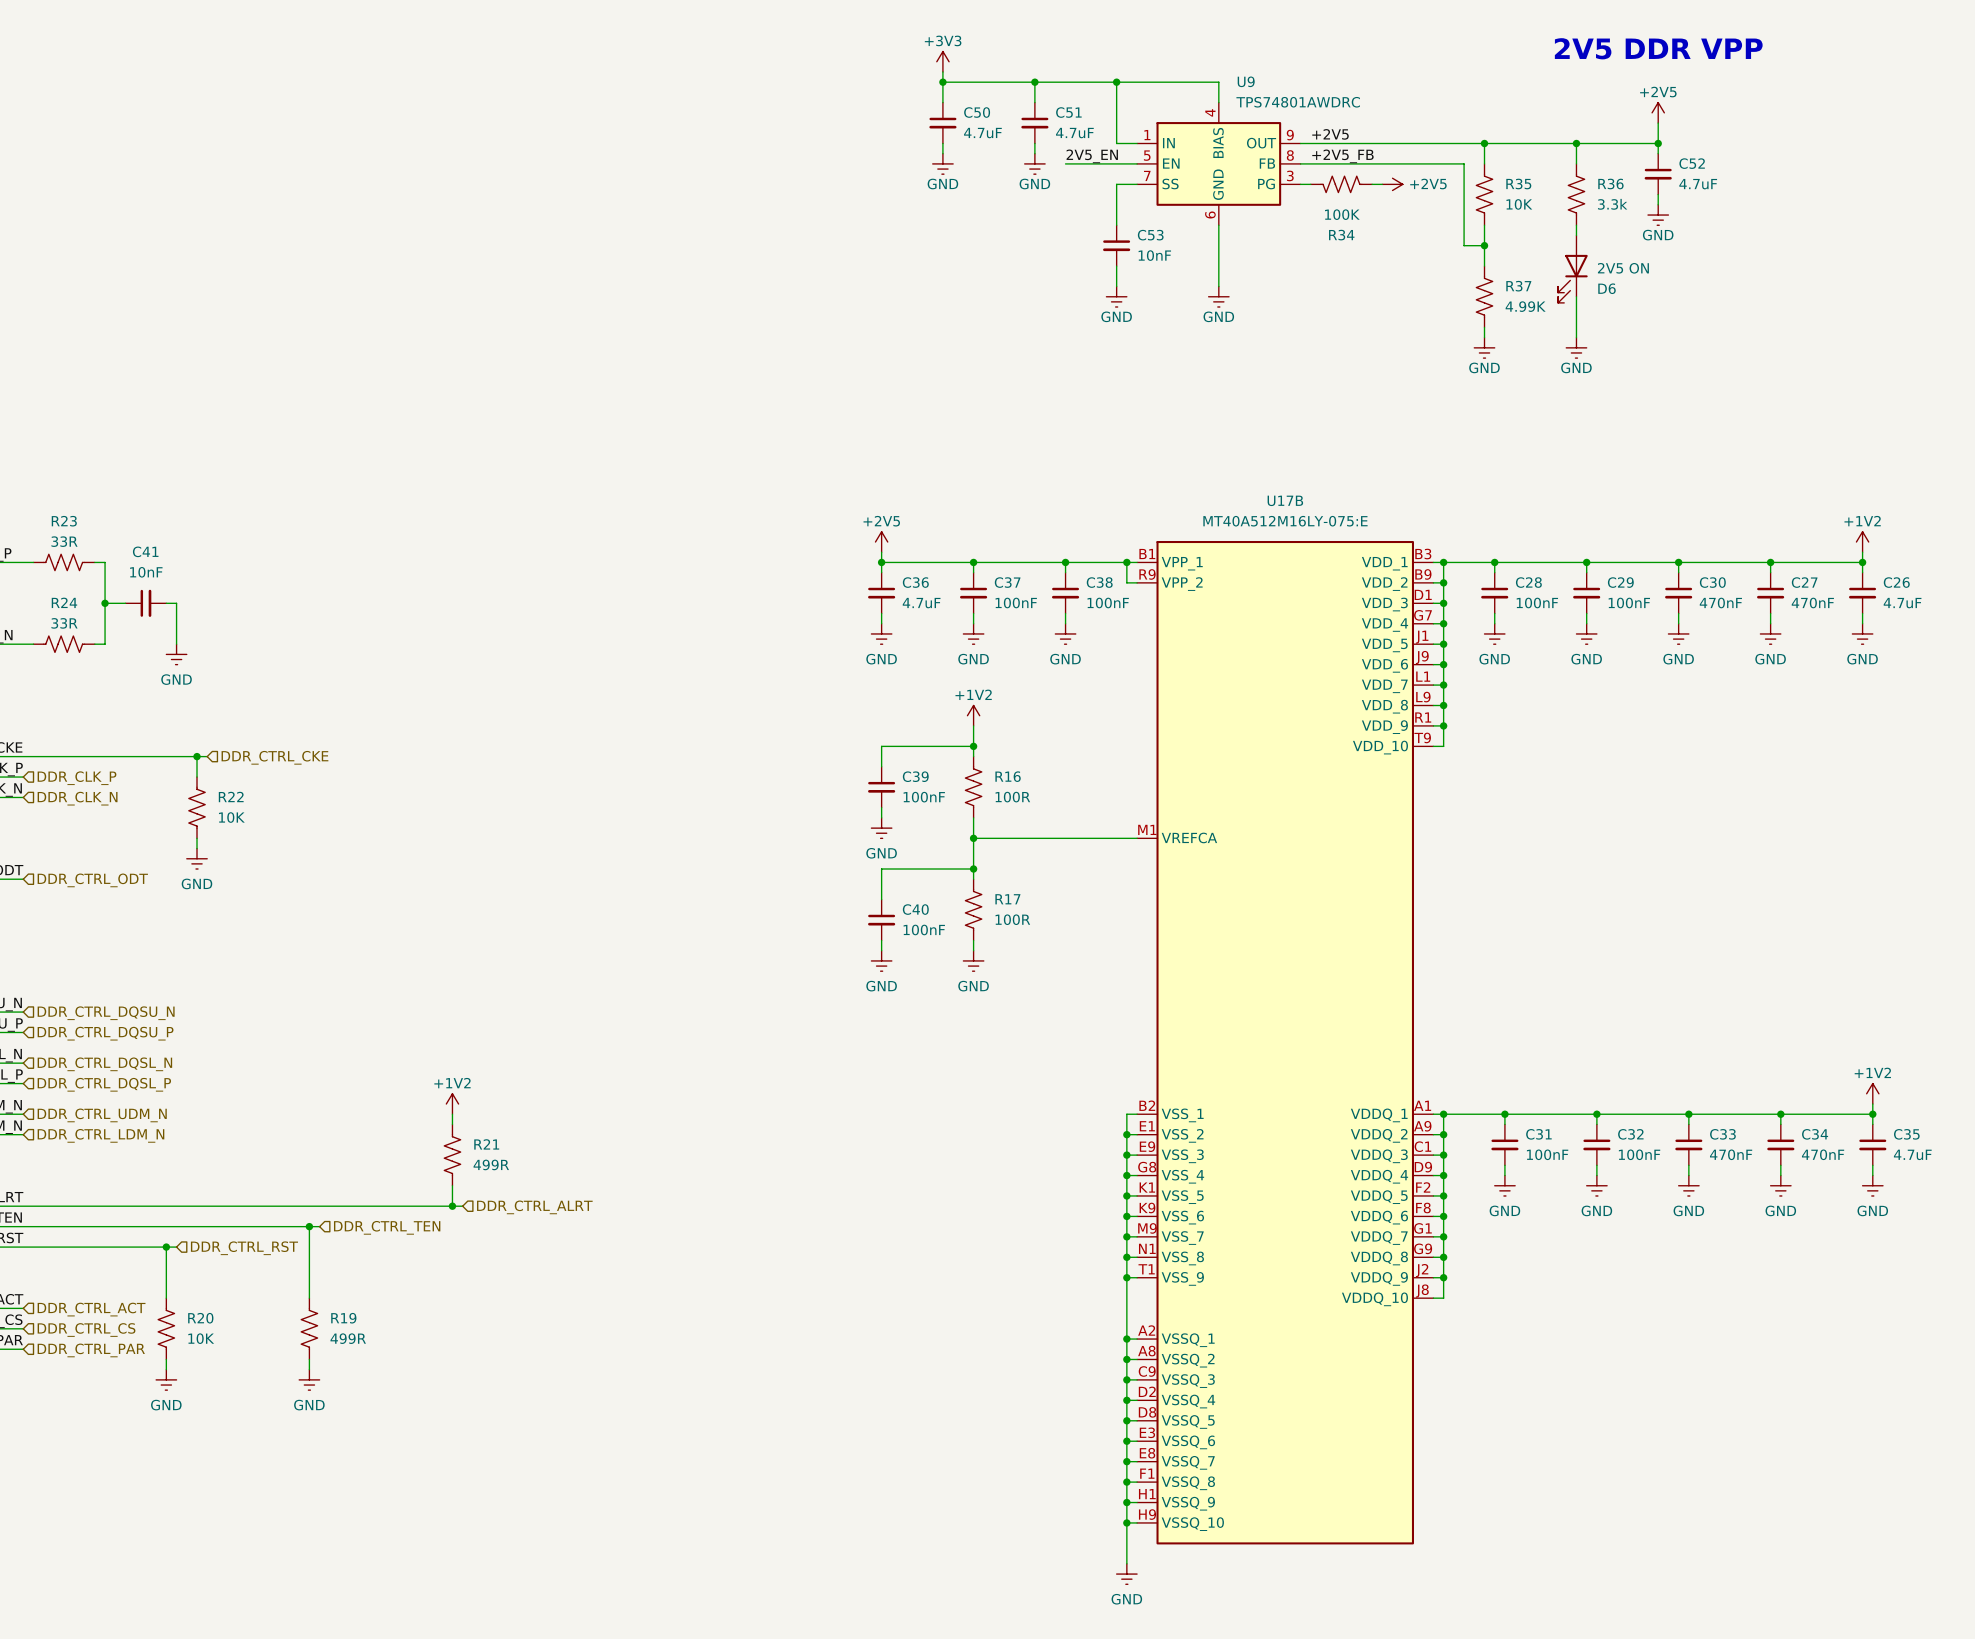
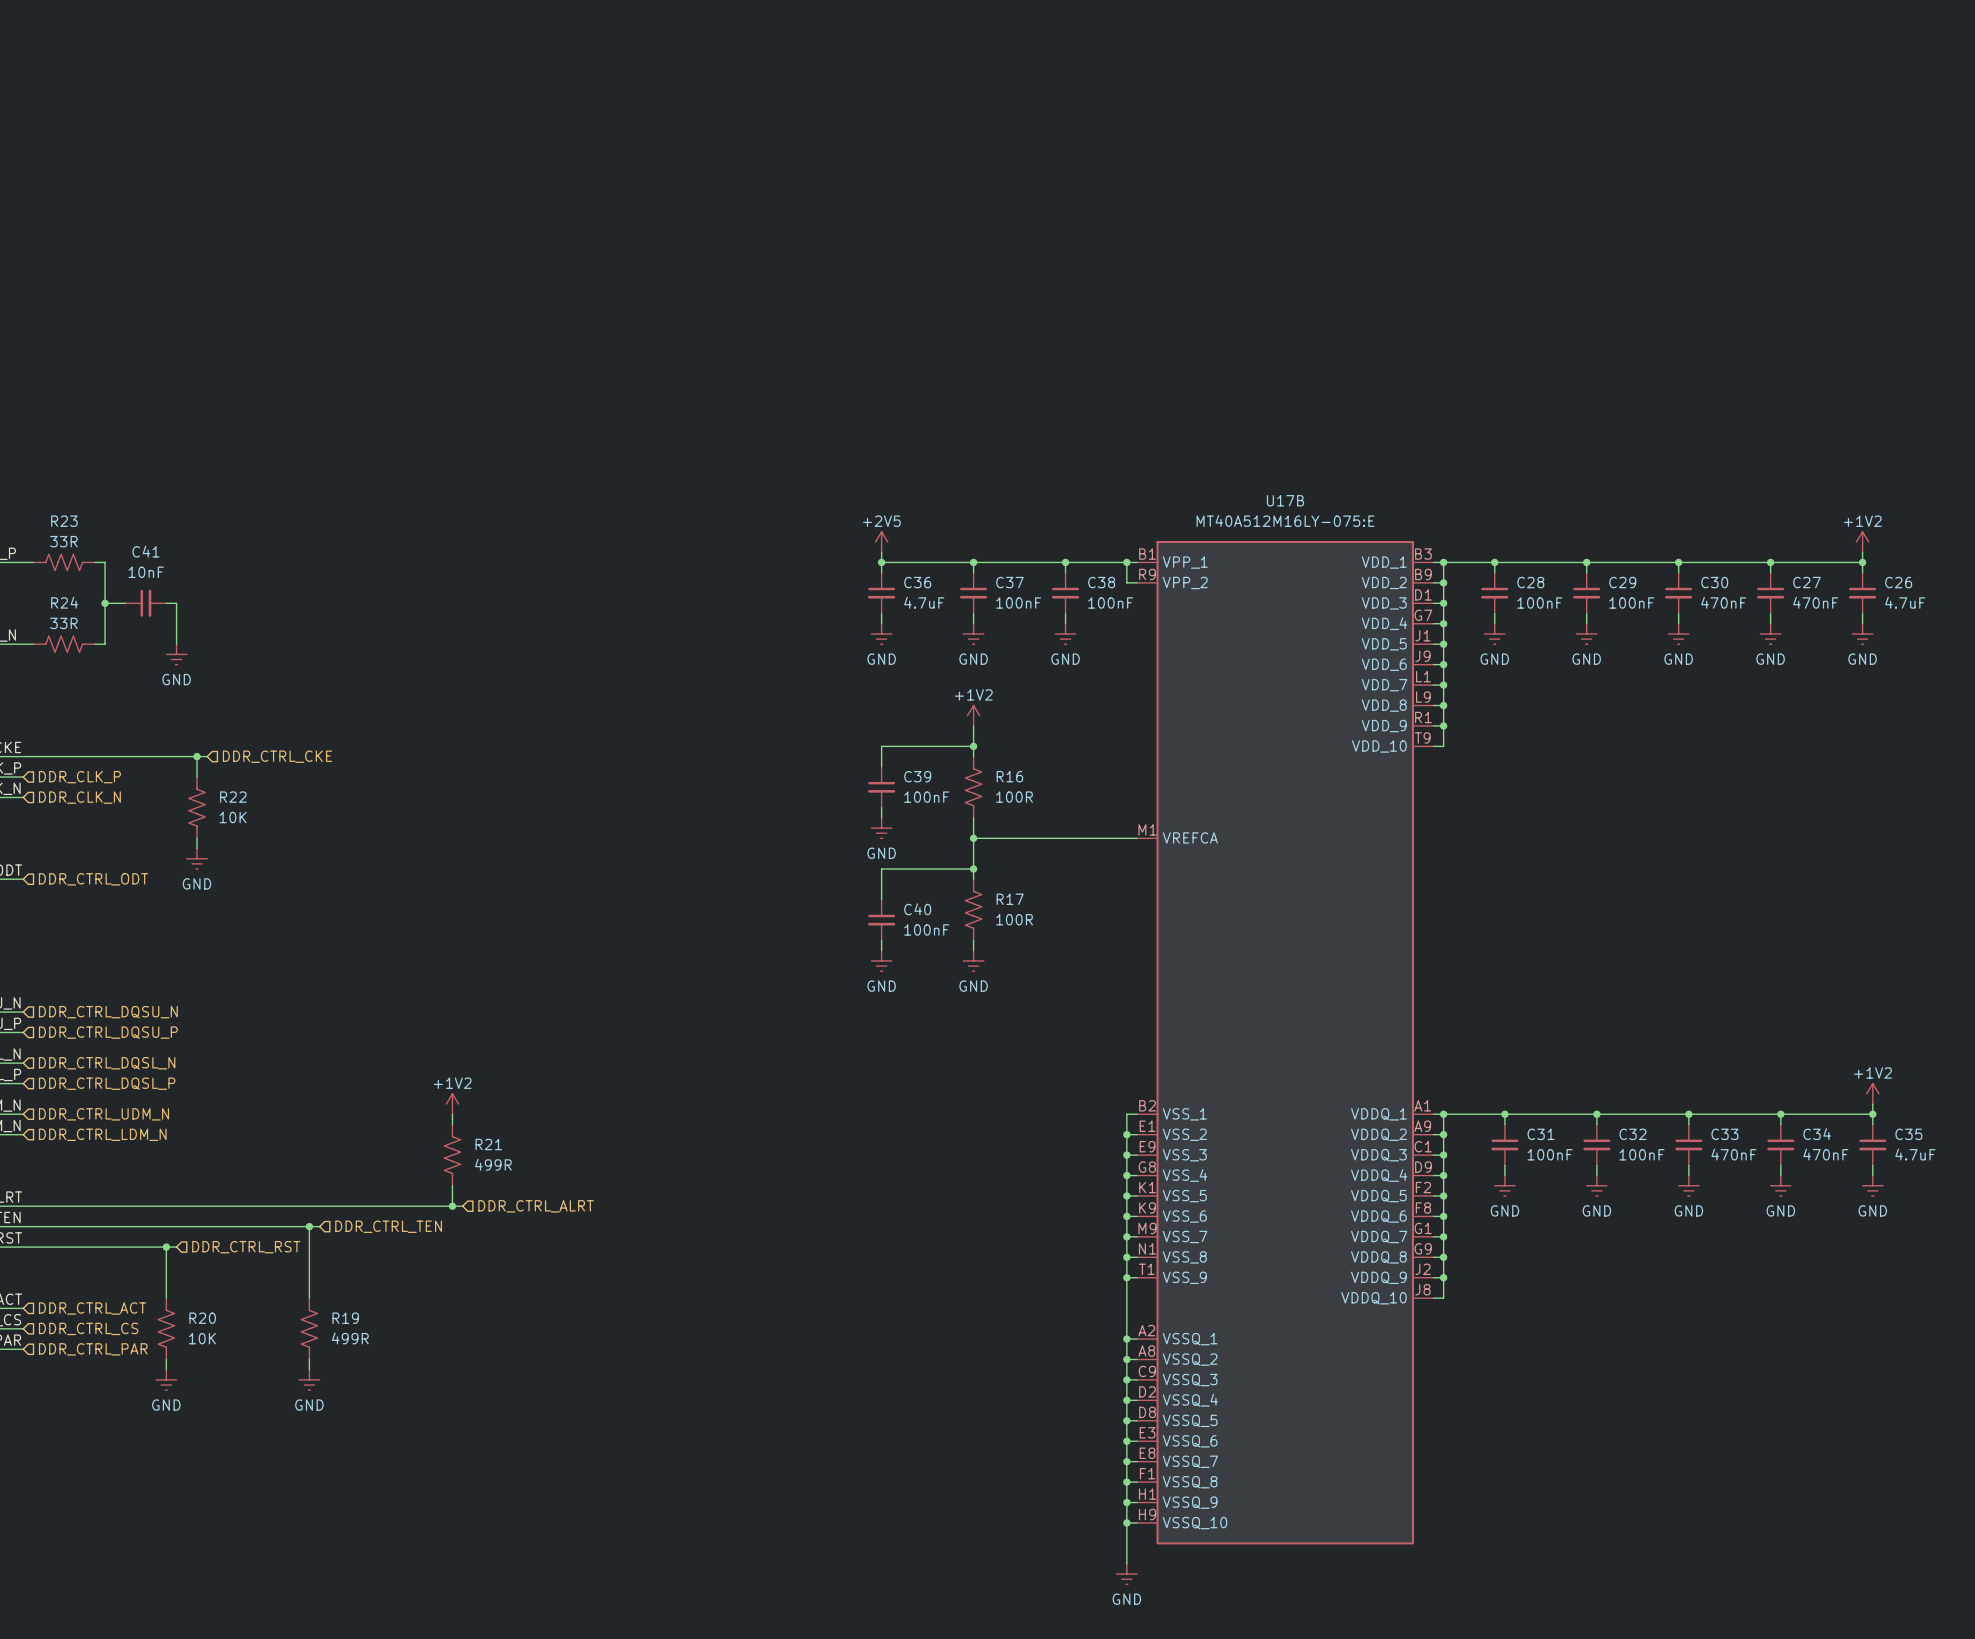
text: 2V5 DDR VPP (1658, 48) -> none
power symbol: +3V3 (942, 61) -> none
wire: (942, 71) (942, 102) -> none
wire: (942, 82) (1218, 82) (1218, 102) -> none
junction: (942, 82) -> none
wire: (1034, 82) (1034, 102) -> none
junction: (1034, 82) -> none
wire: (1116, 82) (1116, 143) (1137, 143) -> none
junction: (1116, 82) -> none
power symbol: +2V5 (1658, 112) -> none
C50: 4.7uF (942, 123) -> none
C51: 4.7uF (1034, 123) -> none
wire: (1658, 123) (1658, 153) -> none
label: +2V5 (1330, 134) -> none
wire: (942, 143) (942, 153) -> none
wire: (1034, 143) (1034, 153) -> none
wire: (1300, 143) (1658, 143) -> none
wire: (1484, 143) (1484, 163) -> none
junction: (1484, 143) -> none
wire: (1576, 143) (1576, 163) -> none
junction: (1576, 143) -> none
junction: (1658, 143) -> none
label: 2V5_EN (1092, 156) -> none
label: +2V5_FB (1342, 156) -> none
power symbol: GND (942, 163) -> none
power symbol: GND (1034, 163) -> none
wire: (1065, 163) (1137, 163) -> none
U9: TPS74801AWDRC (1218, 163) -> none
wire: (1300, 163) (1464, 163) (1464, 245) (1484, 245) -> none
C52: 4.7uF (1658, 174) -> none
wire: (1137, 184) (1116, 184) (1116, 225) -> none
wire: (1300, 184) (1310, 184) -> none
R34: 100K (1341, 184) -> none
wire: (1372, 184) (1382, 184) -> none
power symbol: +2V5 (1392, 184) -> none
R35: 10K (1484, 194) -> none
R36: 3.3k (1576, 194) -> none
wire: (1658, 194) (1658, 204) -> none
power symbol: GND (1658, 215) -> none
wire: (1218, 225) (1218, 286) -> none
wire: (1484, 225) (1484, 266) -> none
wire: (1576, 225) (1576, 235) -> none
C53: 10nF (1116, 245) -> none
junction: (1484, 245) -> none
wire: (1116, 266) (1116, 286) -> none
D6: 2V5 ON (1572, 269) -> none
power symbol: GND (1116, 296) -> none
power symbol: GND (1218, 296) -> none
R37: 4.99K (1484, 296) -> none
wire: (1576, 296) (1576, 337) -> none
wire: (1484, 327) (1484, 337) -> none
power symbol: GND (1484, 347) -> none
power symbol: GND (1576, 347) -> none

